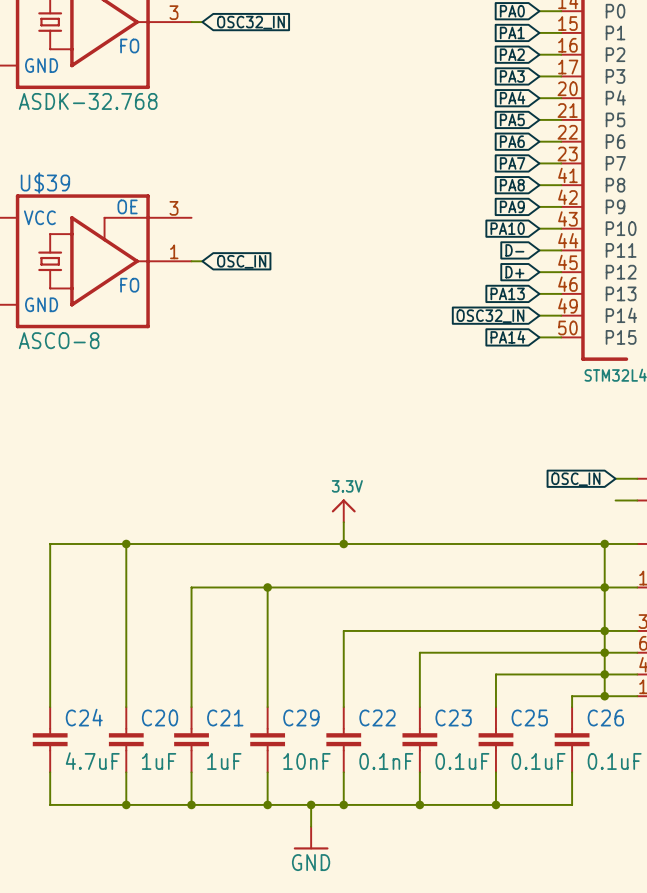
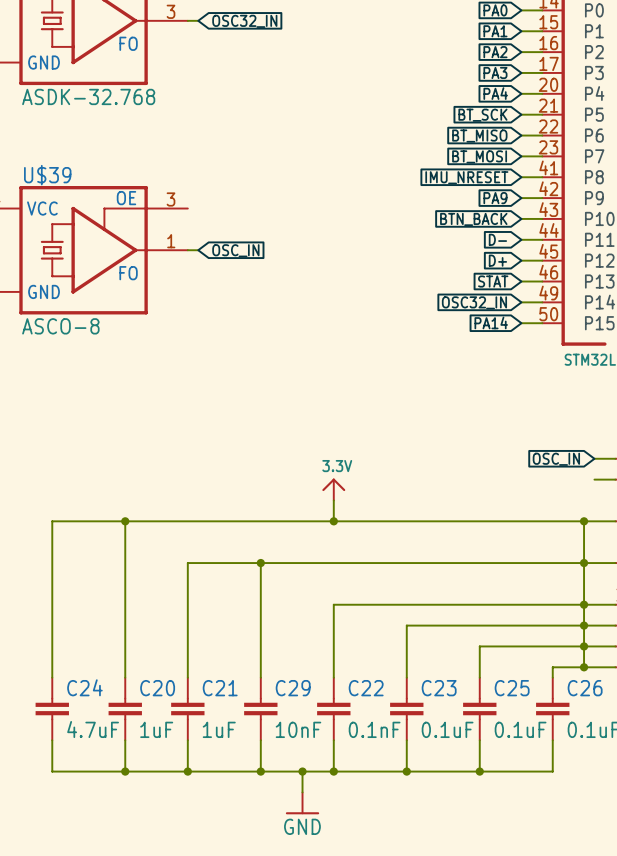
global label: PA5 (512, 119) -> BT_SCK (482, 115)
global label: PA6 (512, 141) -> BT_MISO (479, 136)
global label: PA7 (512, 163) -> BT_MOSI (479, 156)
global label: PA8 (512, 185) -> IMU_NRESET (466, 177)
global label: PA10 (507, 228) -> BTN_BACK (473, 219)
global label: PA13 (507, 293) -> STAT (493, 281)

